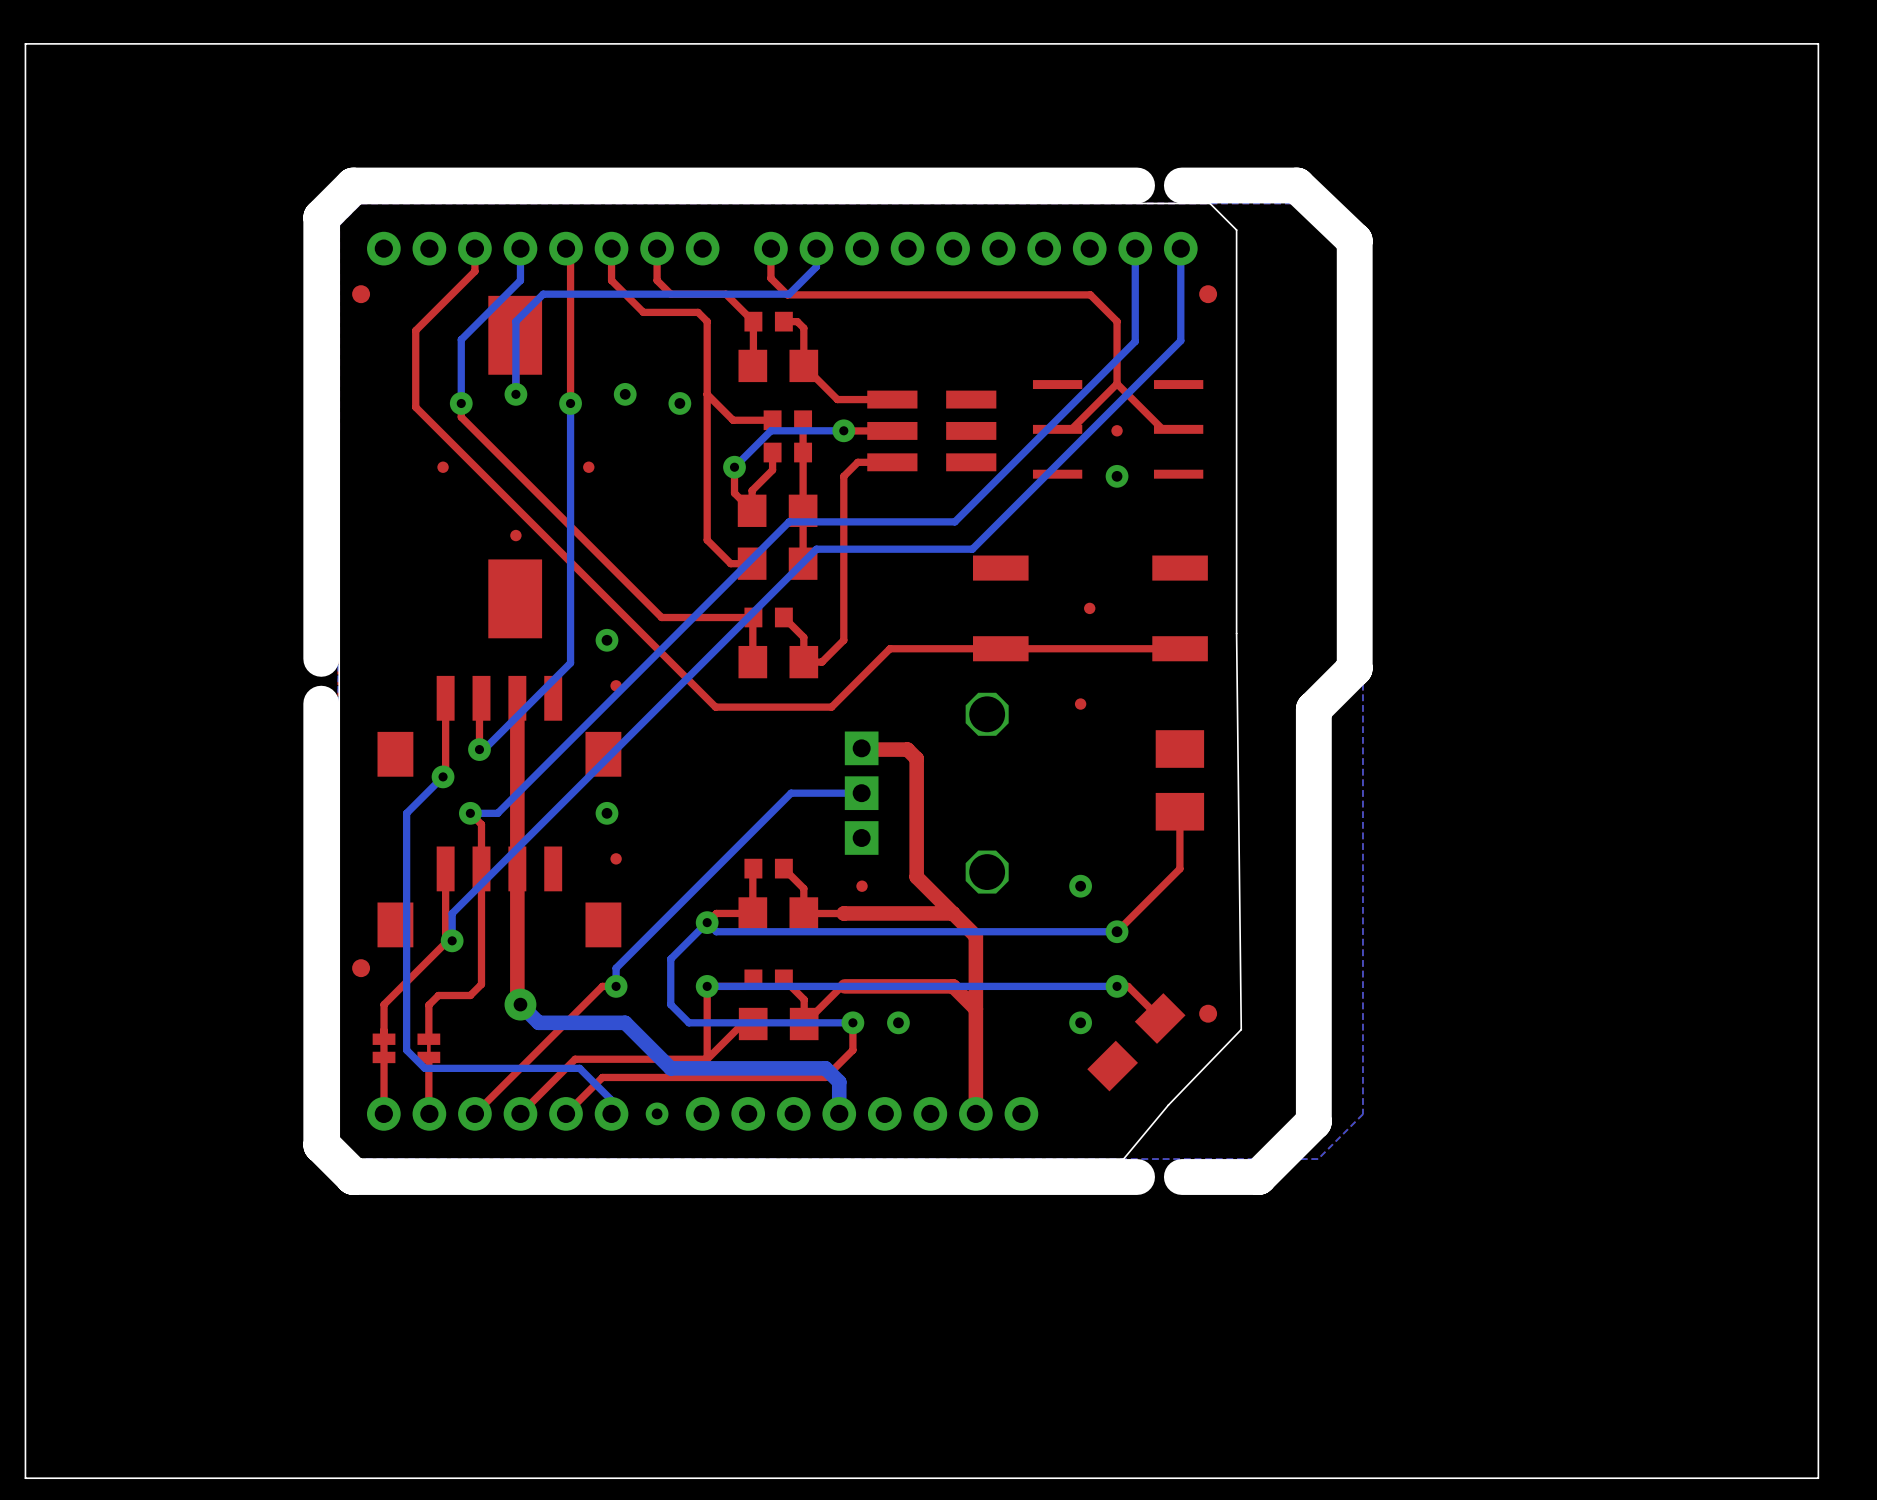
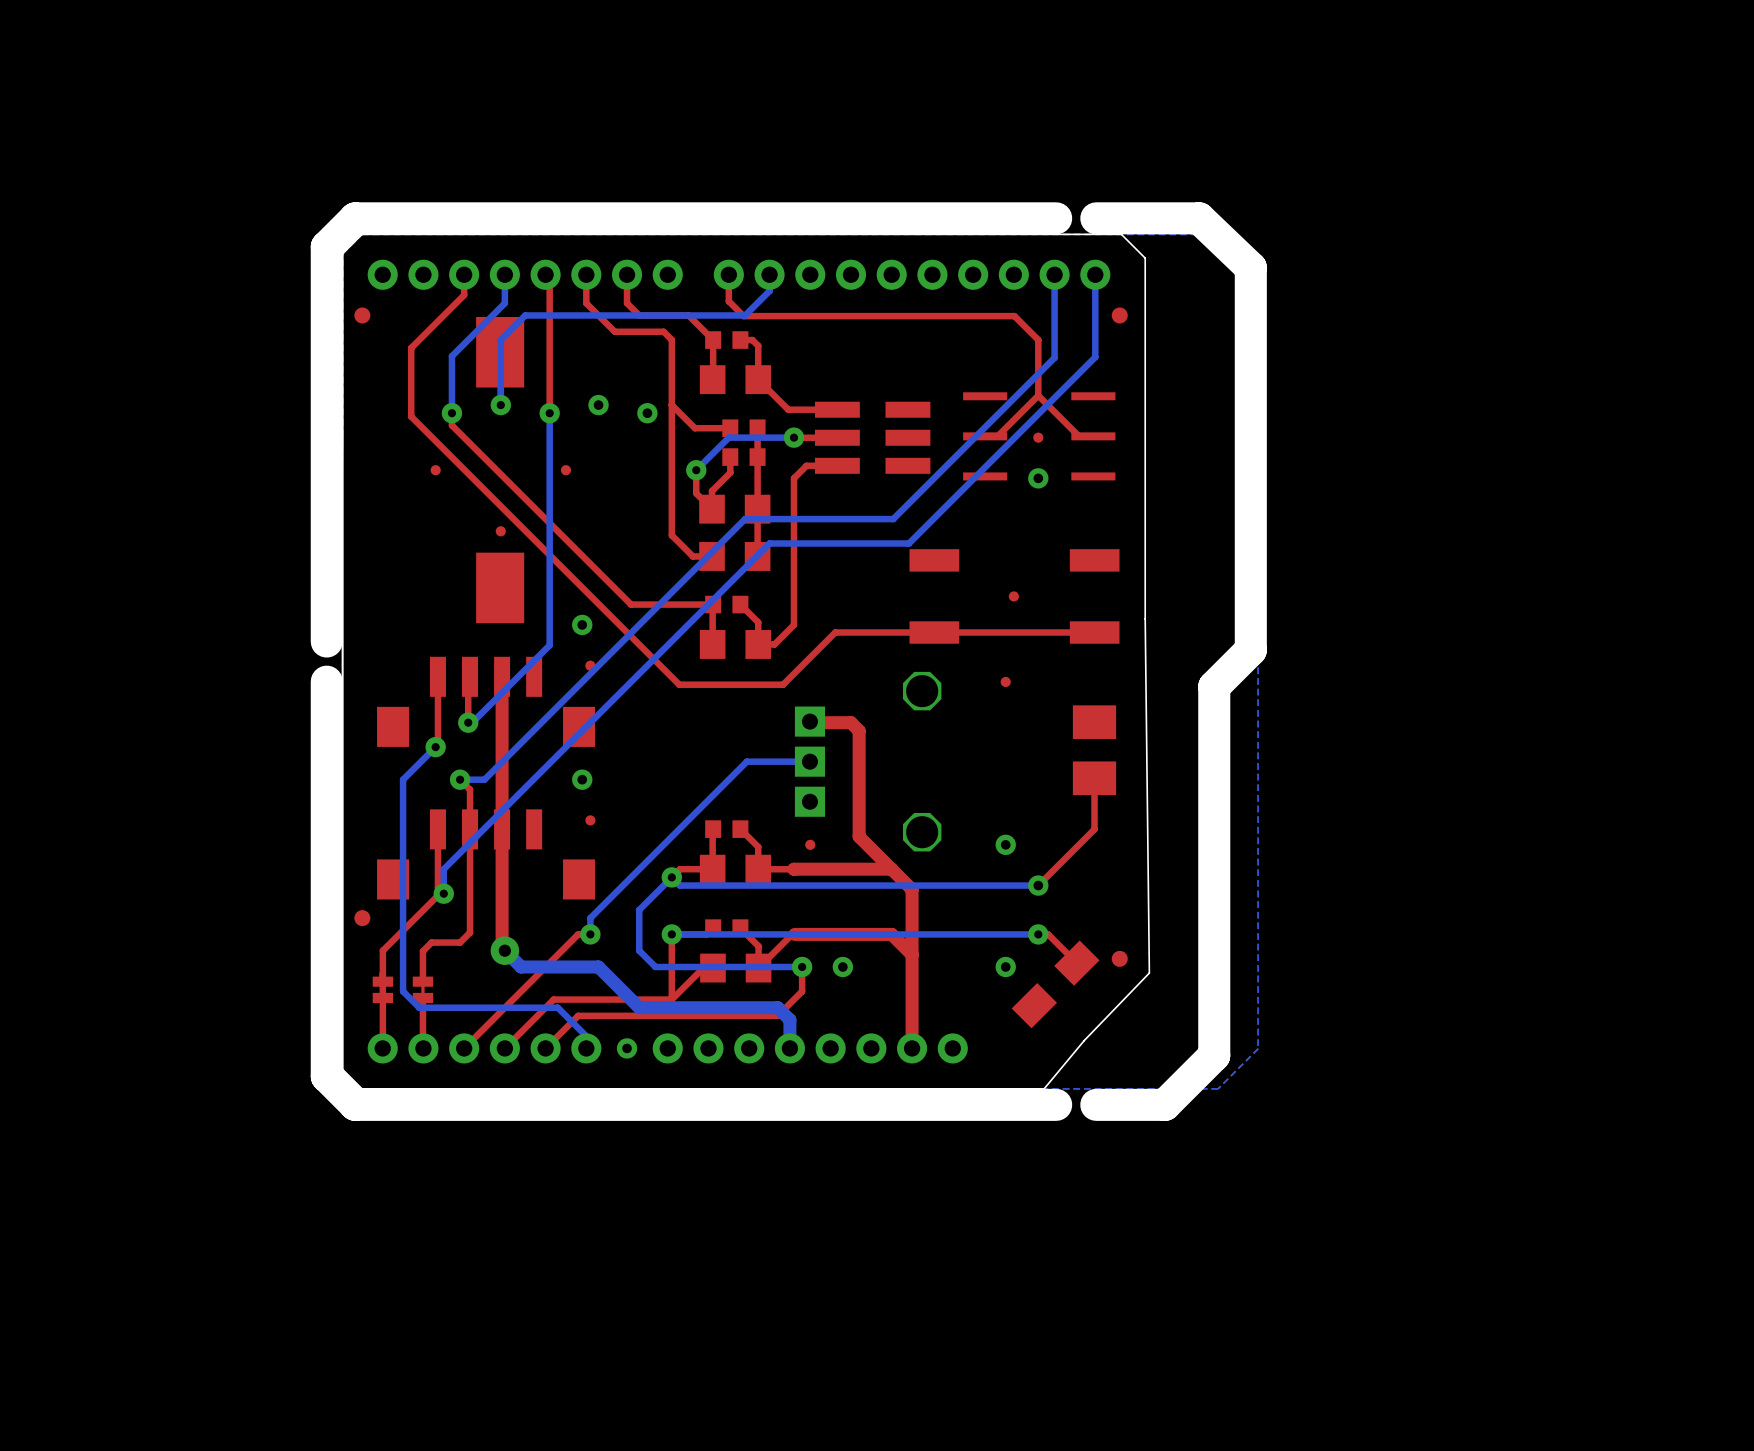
board edge: (1818, 43) (25, 43) (25, 1478) (1818, 1478) (1818, 43) -> none

